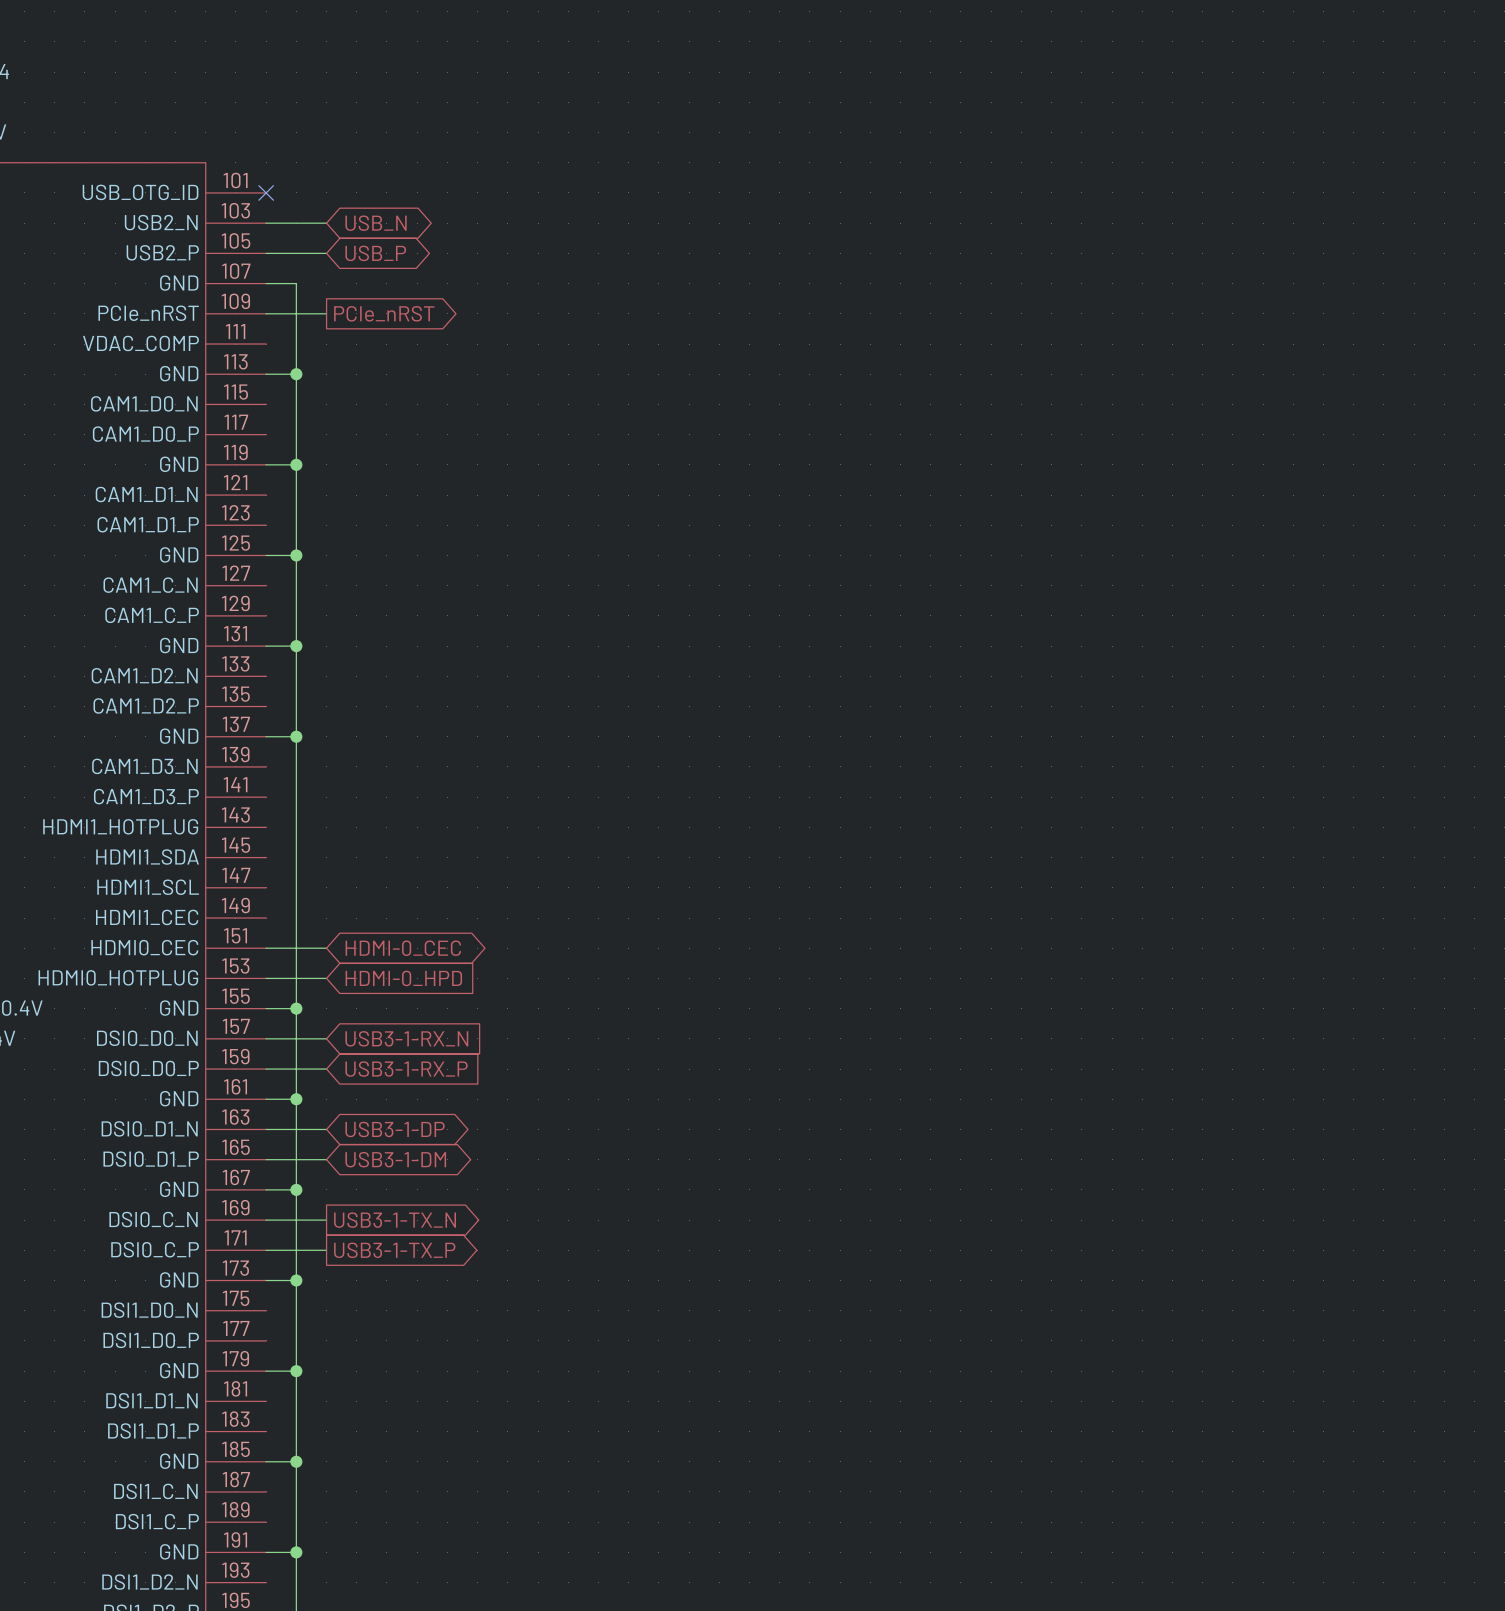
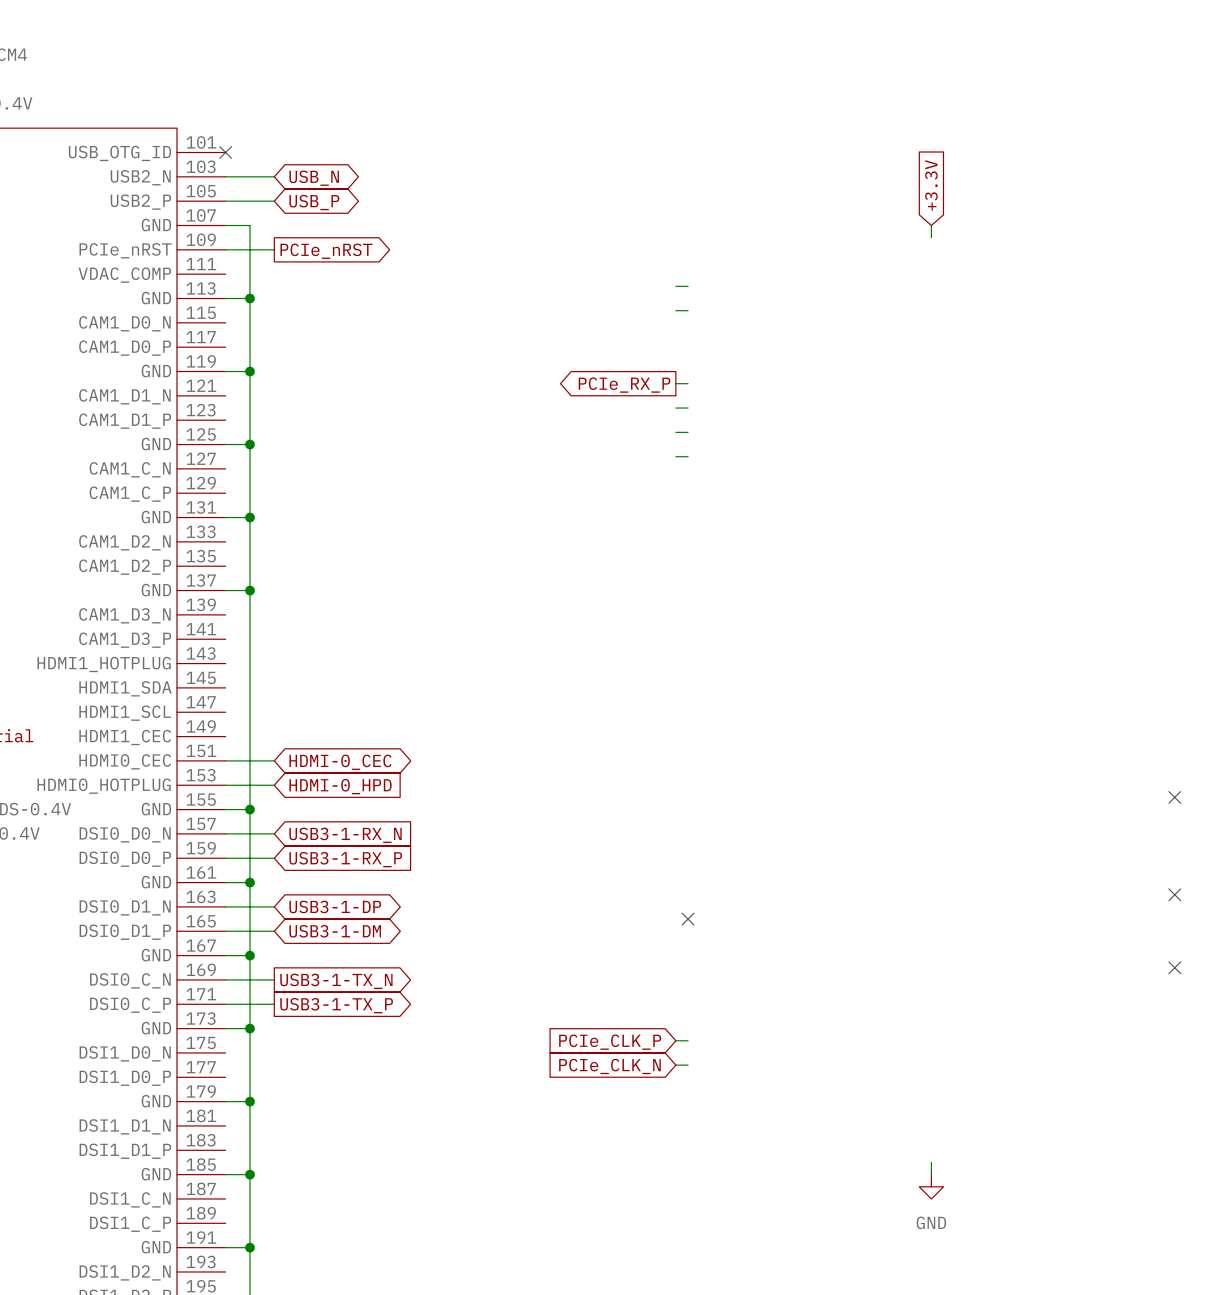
global label: none -> +3.3V (931, 185)
wire: none -> (931, 225) (931, 237)
wire: none -> (675, 286) (688, 286)
wire: none -> (675, 310) (688, 310)
global label: none -> PCIe_RX_P (624, 385)
wire: none -> (675, 383) (688, 383)
wire: none -> (675, 408) (688, 408)
wire: none -> (675, 432) (688, 432)
wire: none -> (675, 456) (688, 456)
no-connect mark: none -> (1174, 797)
no-connect mark: none -> (1174, 894)
no-connect mark: none -> (688, 919)
no-connect mark: none -> (1174, 967)
global label: none -> PCIe_CLK_P (610, 1042)
wire: none -> (675, 1040) (688, 1040)
global label: none -> PCIe_CLK_N (609, 1066)
wire: none -> (675, 1065) (688, 1065)
wire: none -> (931, 1162) (931, 1174)
power symbol: none -> GND (931, 1186)

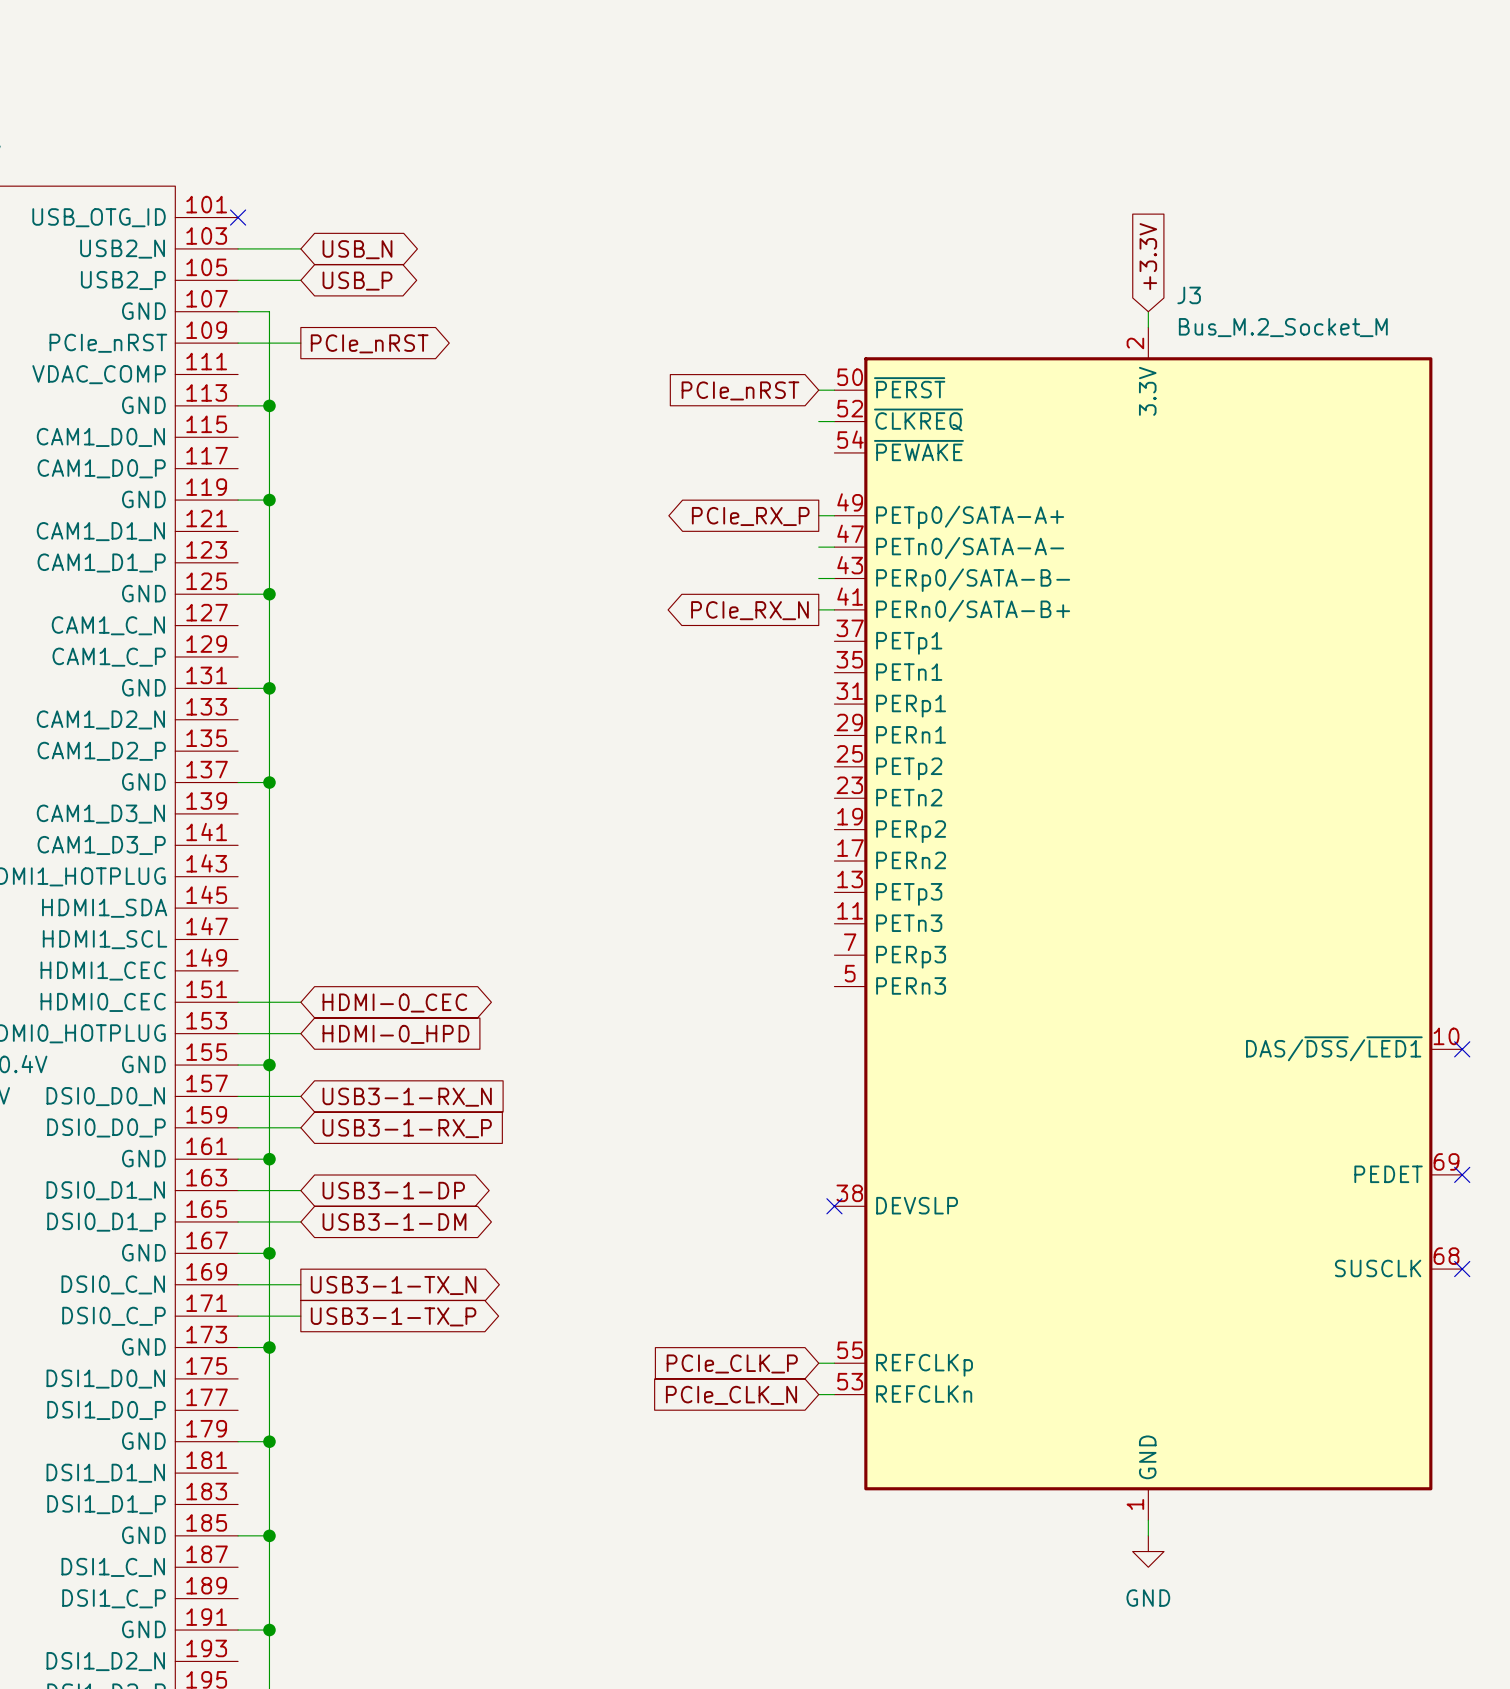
global label: none -> PCIe_nRST (740, 390)
global label: none -> PCIe_RX_N (749, 610)
J3: none -> Bus_M.2_Socket_M (1148, 923)

